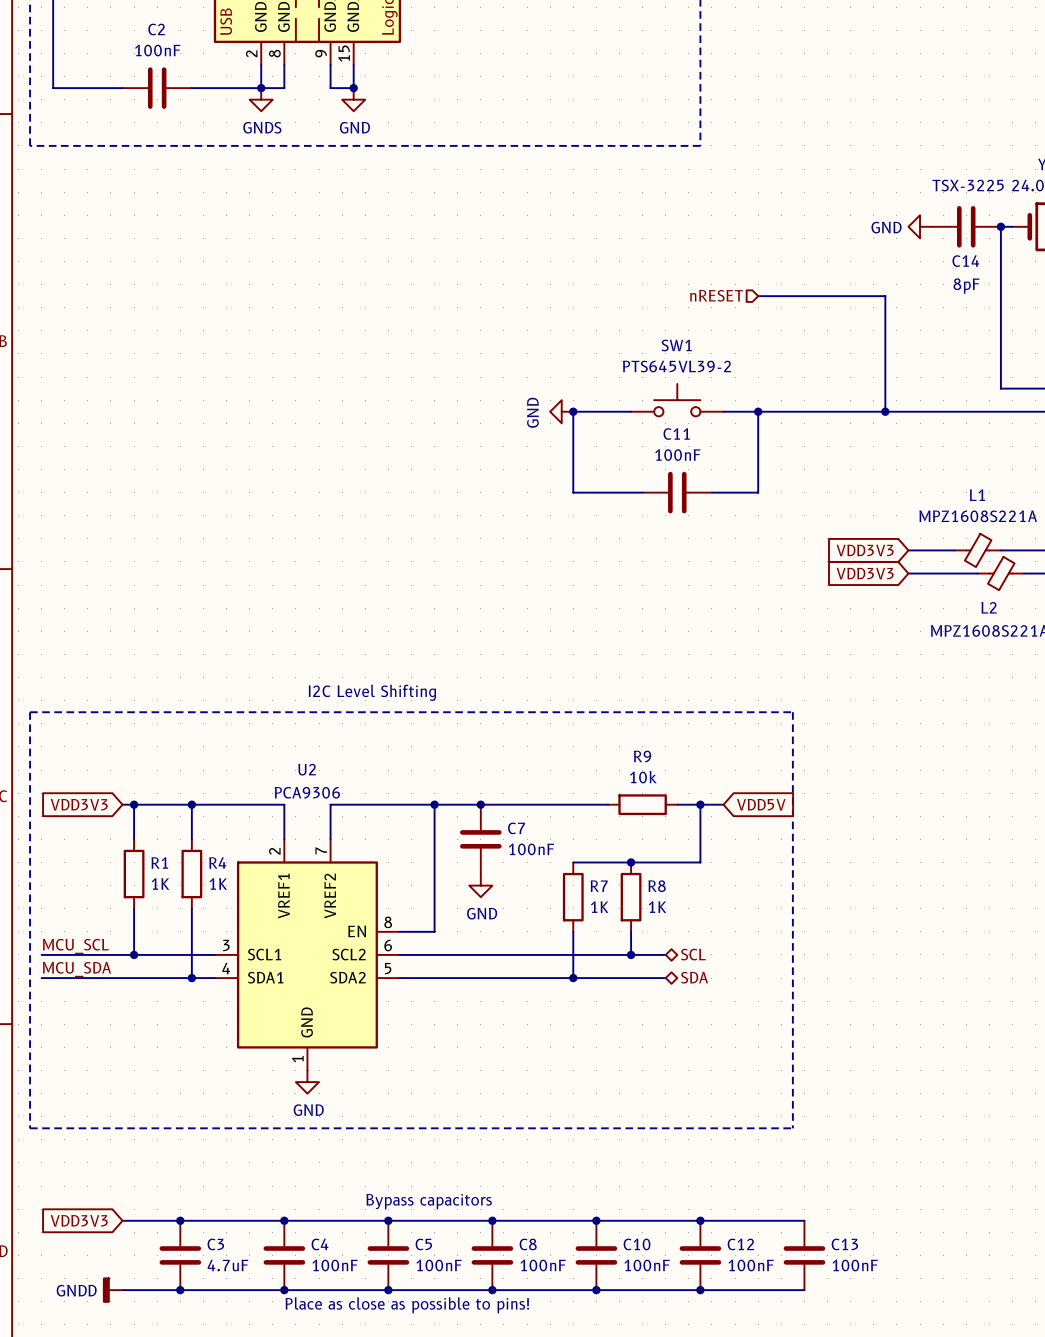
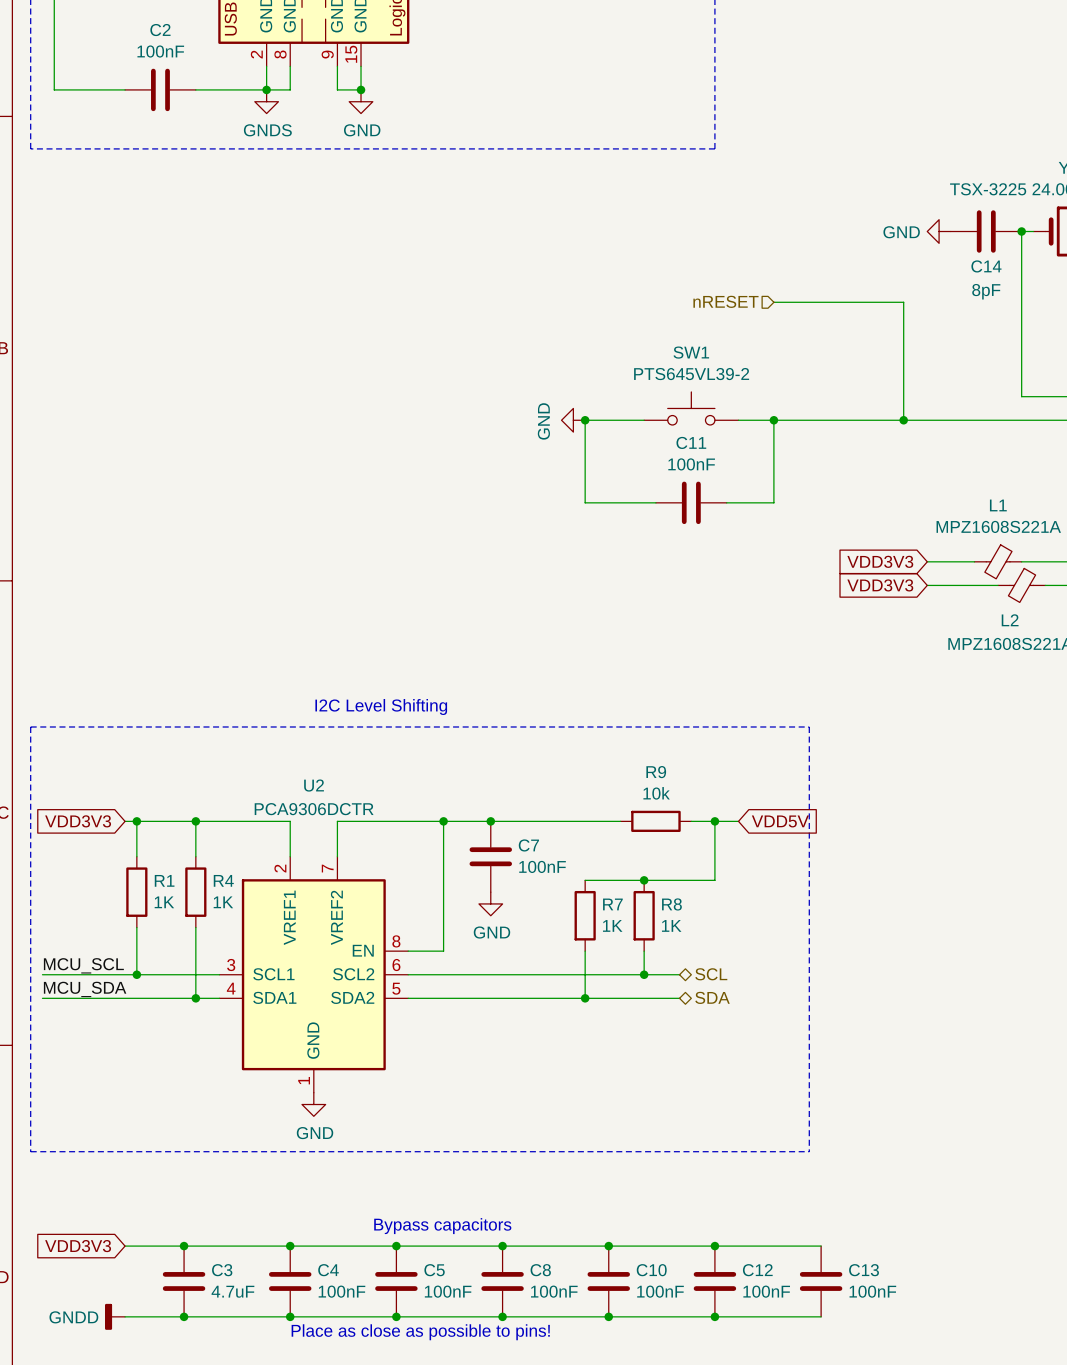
U2 value: PCA9306 (307, 792) -> PCA9306DCTR (314, 809)

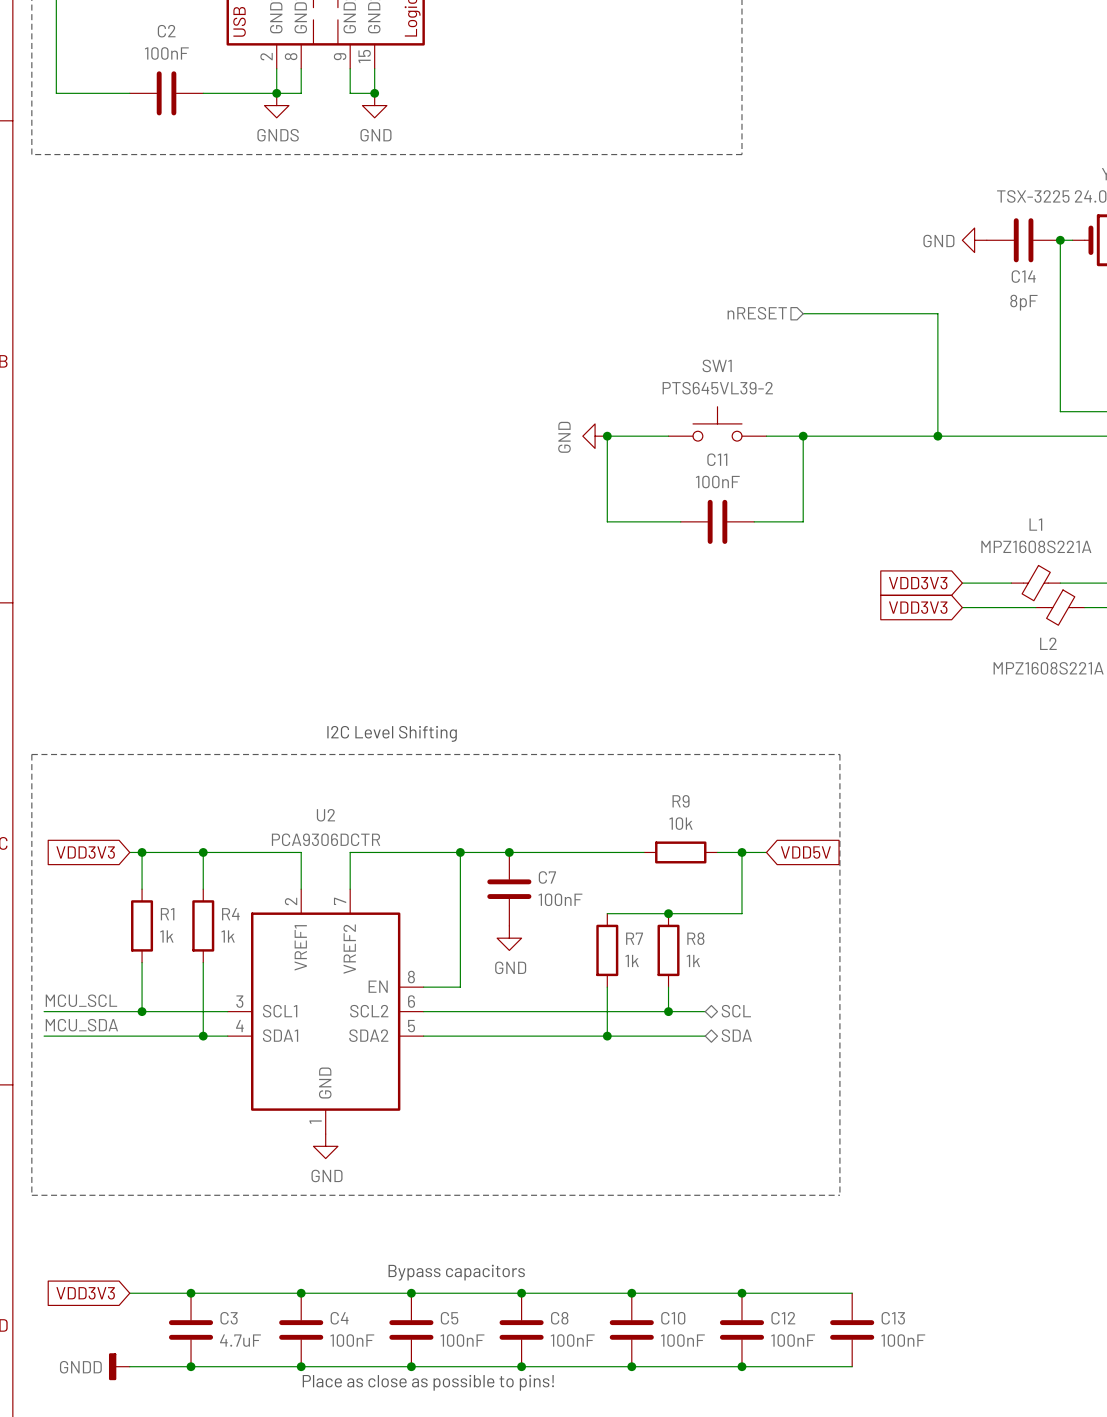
R1 value: 1K (164, 902) -> 1k (166, 936)
R4 value: 1K (223, 902) -> 1k (228, 936)
R7 value: 1K (612, 925) -> 1k (632, 960)
R8 value: 1K (671, 925) -> 1k (693, 960)

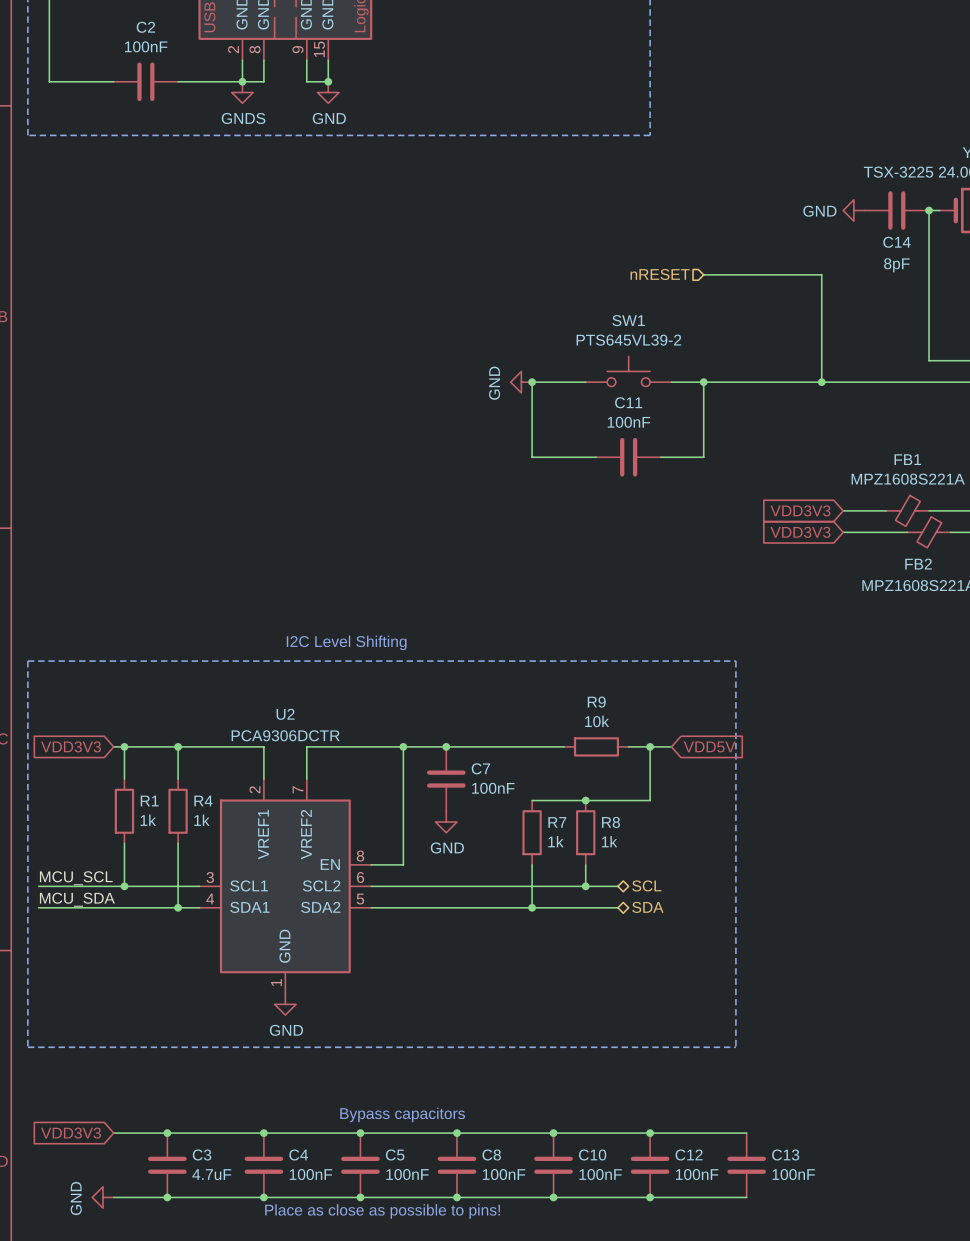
L1 name: L1 (1035, 524) -> FB1 (907, 459)
L2 name: L2 (1048, 643) -> FB2 (918, 564)
power symbol: GNDD (119, 1366) -> GND (102, 1197)

